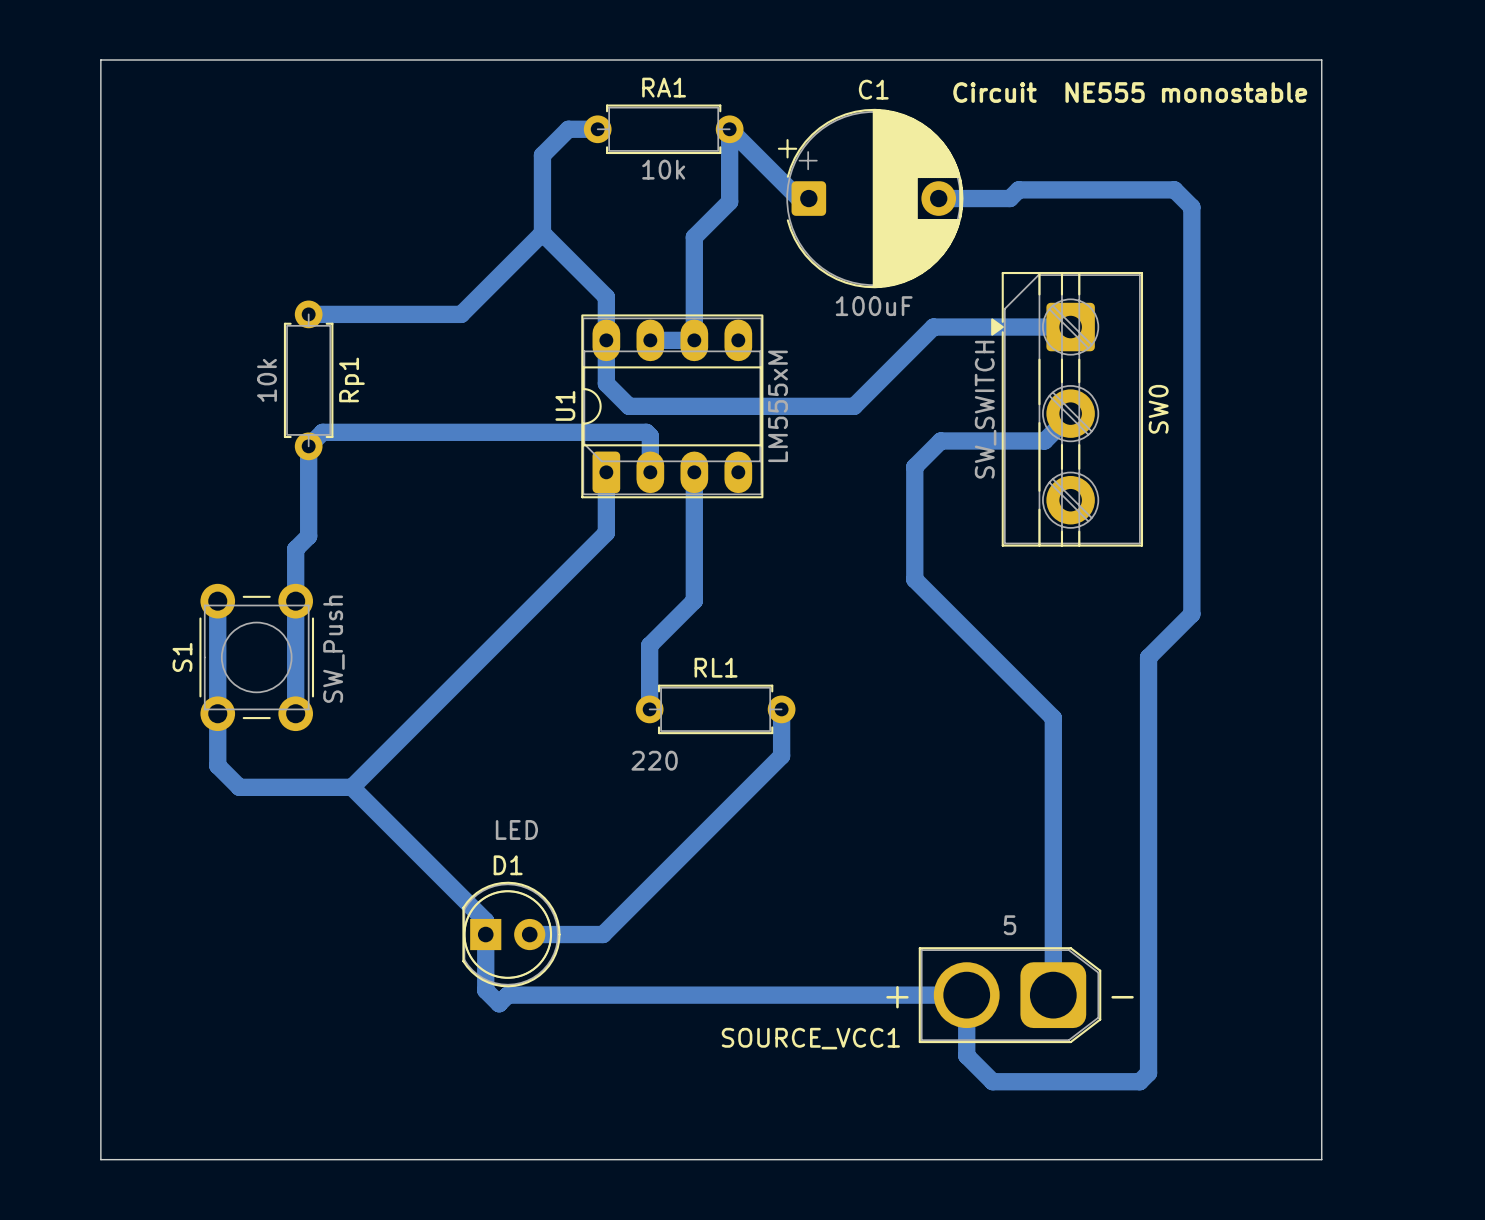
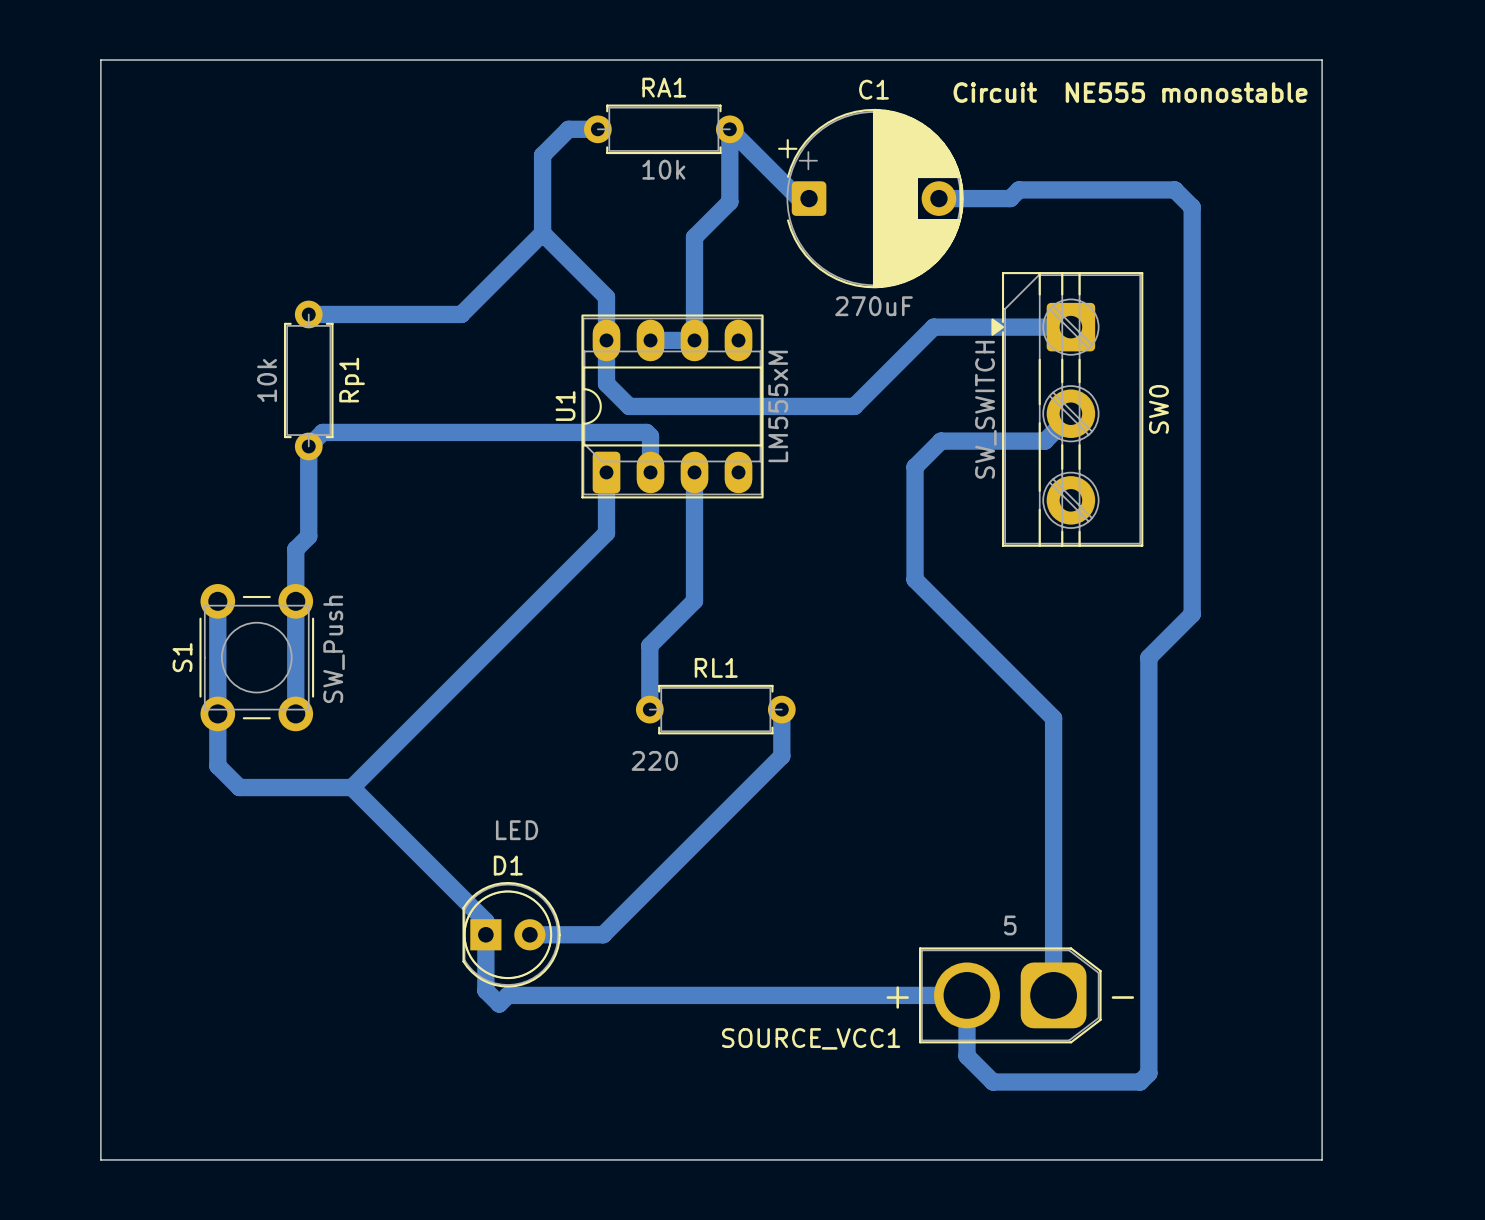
C1 value: 100uF (874, 306) -> 270uF (874, 306)

